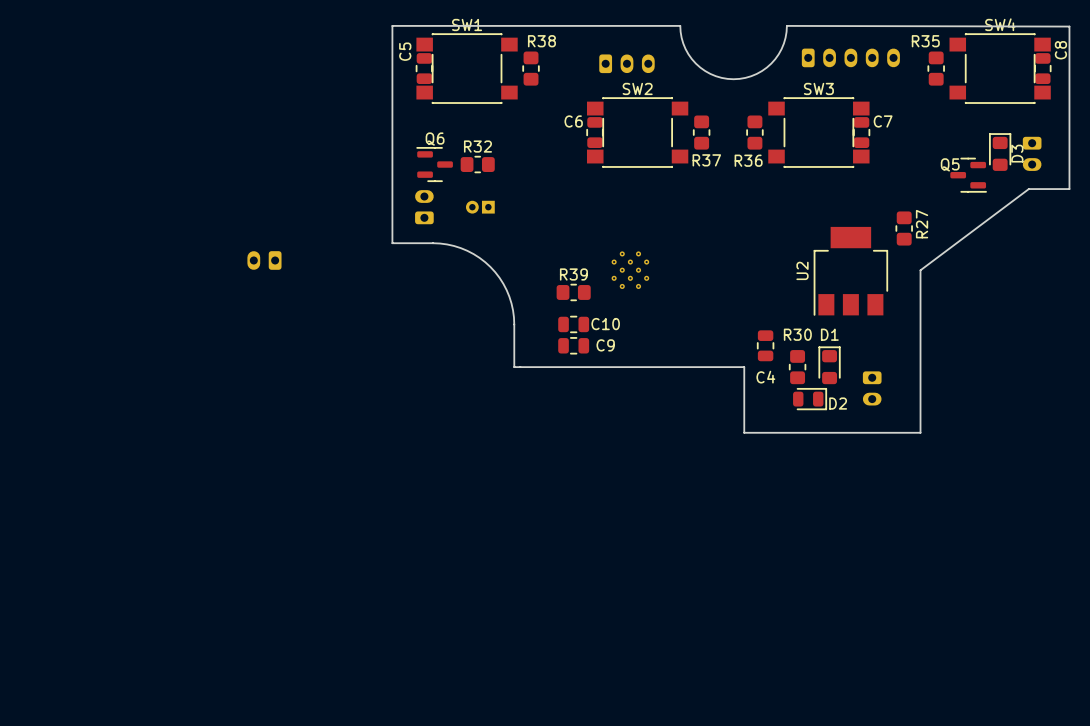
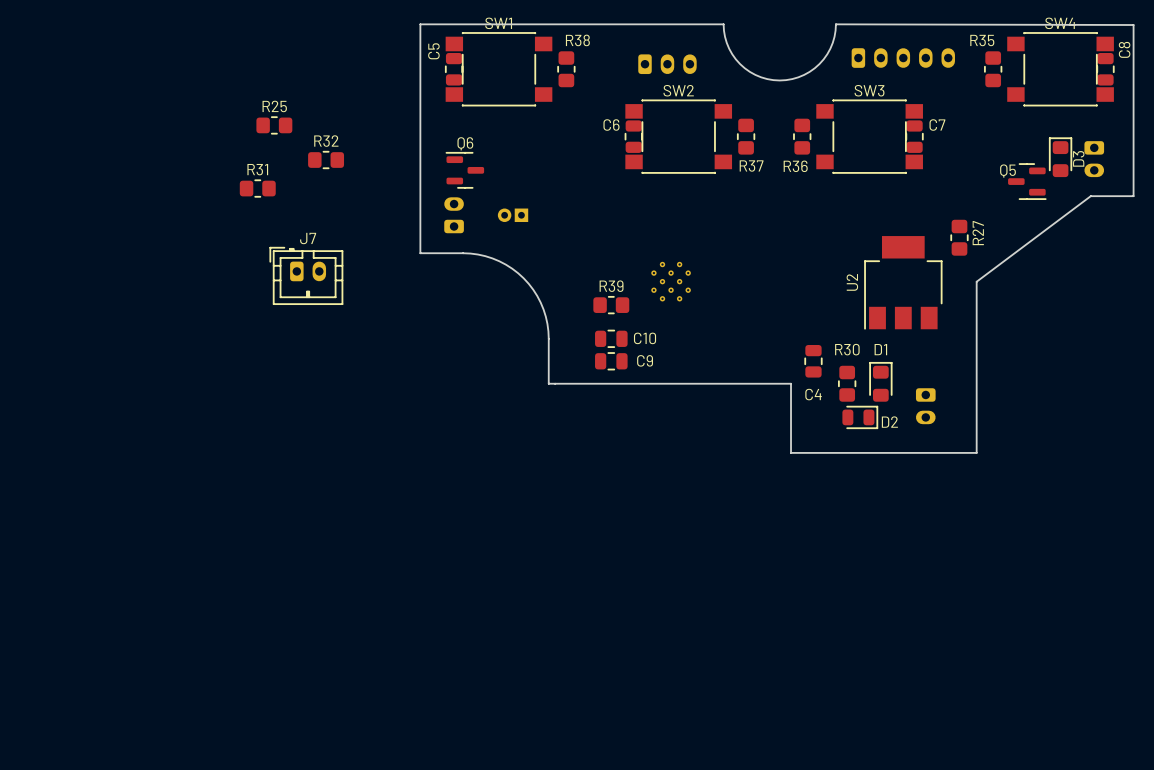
R25: none -> (274, 125)
R32 position: (477, 164) -> (326, 160)
R31: none -> (257, 188)
J7 side: bottom (264, 260) -> top (306, 275)

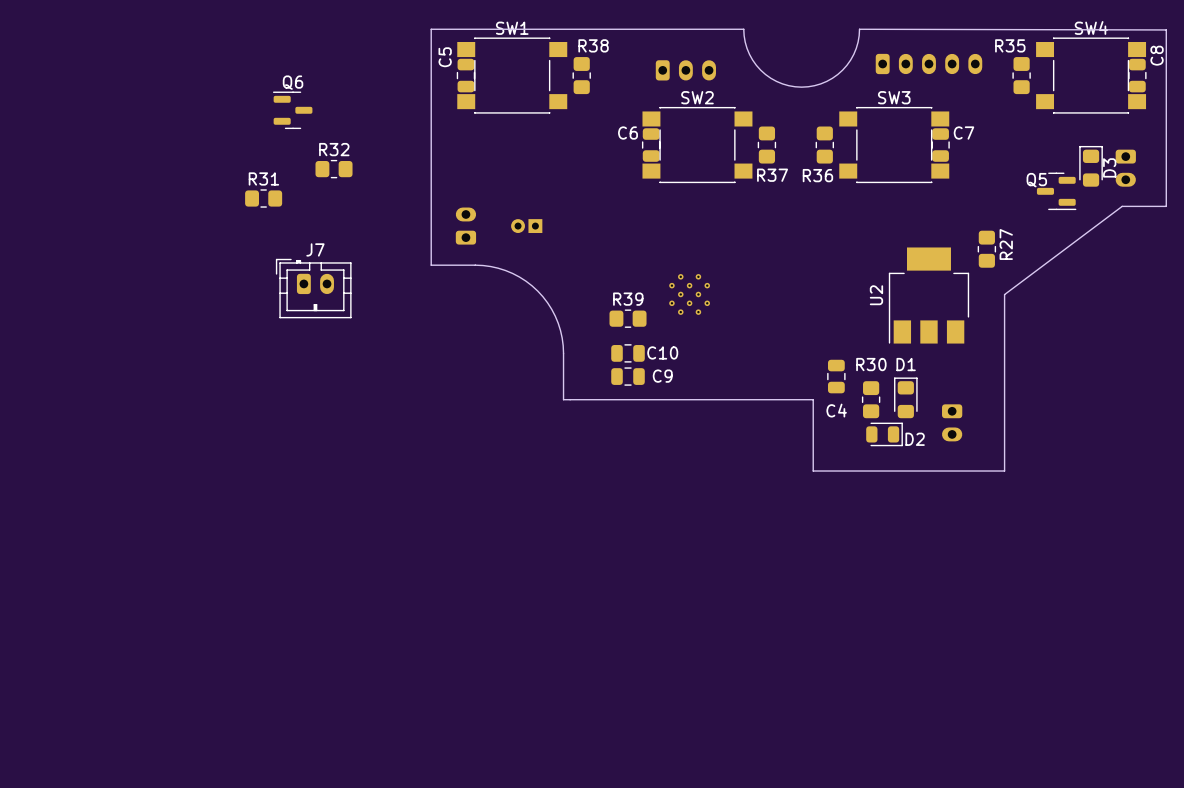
R25: (274, 125) -> none
Q6 position: (464, 170) -> (292, 110)

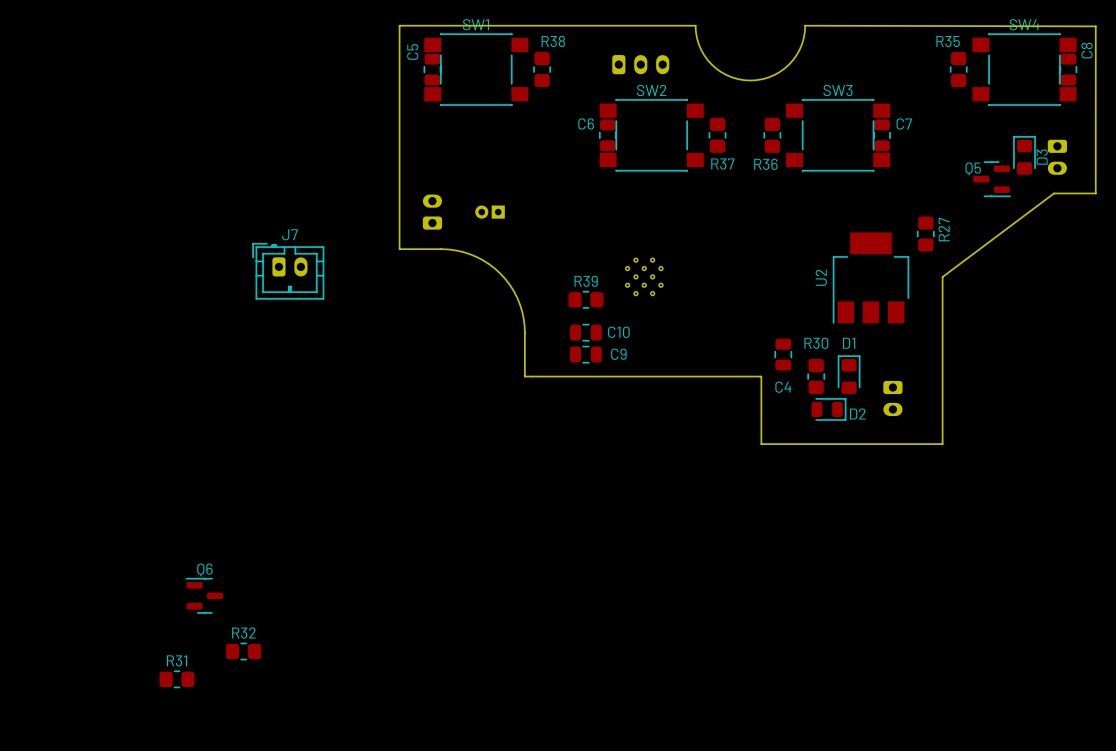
part: (928, 63) -> none
Q6 position: (292, 110) -> (204, 595)
R32 position: (334, 169) -> (243, 651)
R31 position: (263, 198) -> (177, 679)

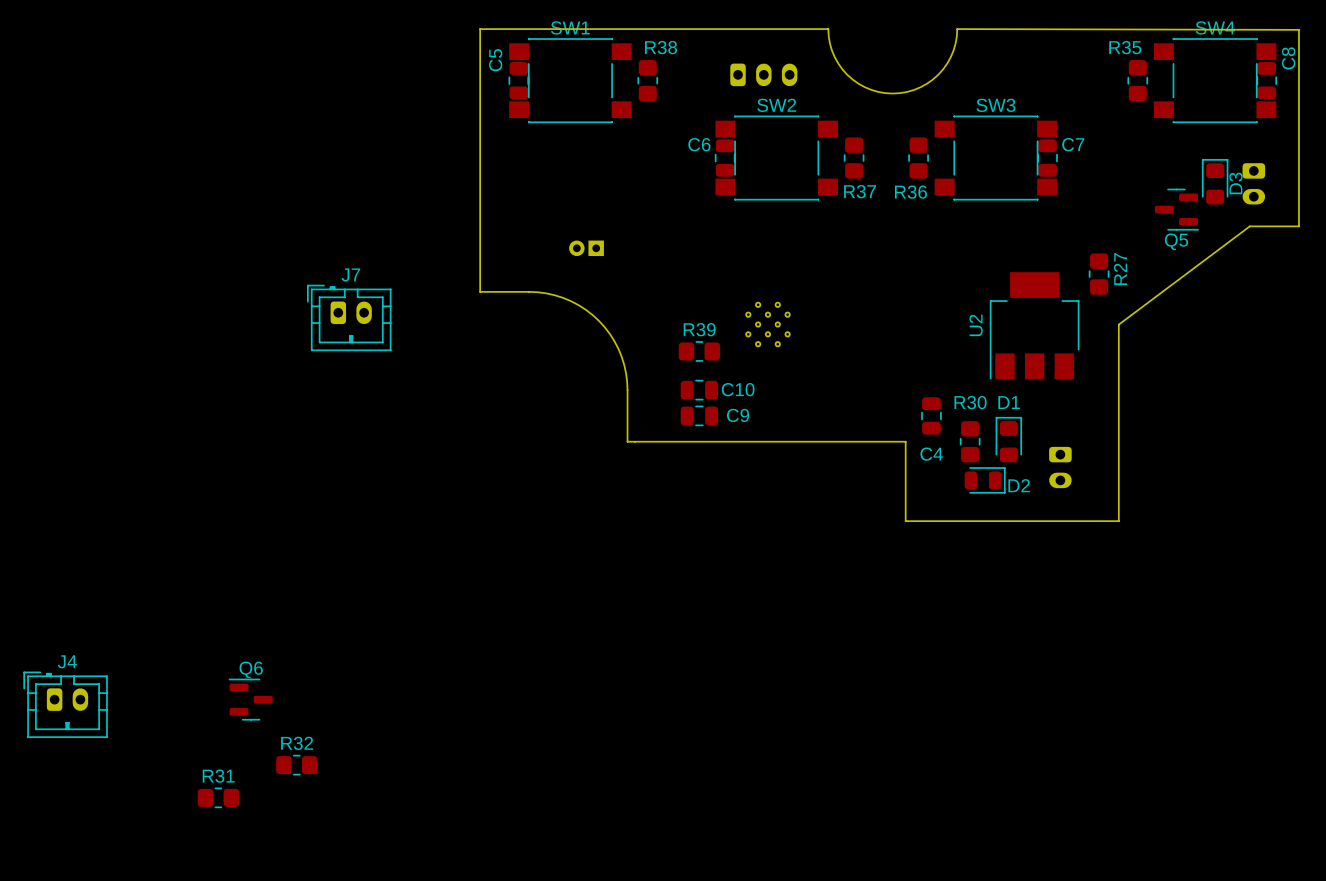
Q5 name position: Q5 (973, 168) -> Q5 (1176, 241)
part: (432, 212) -> none
J4: none -> (65, 704)

